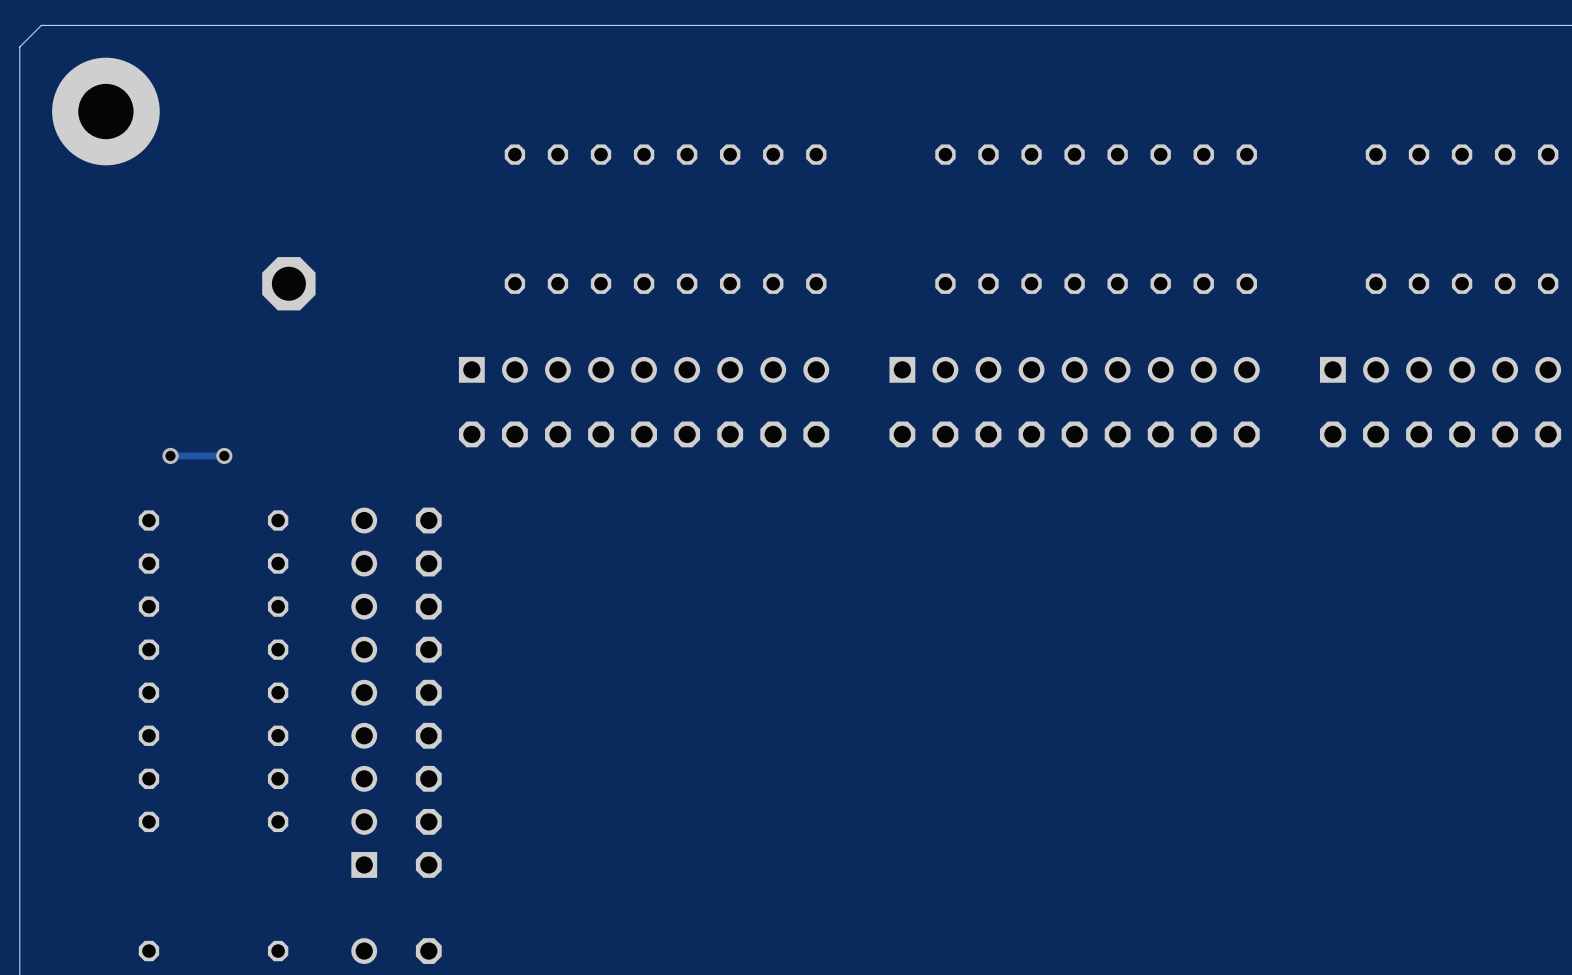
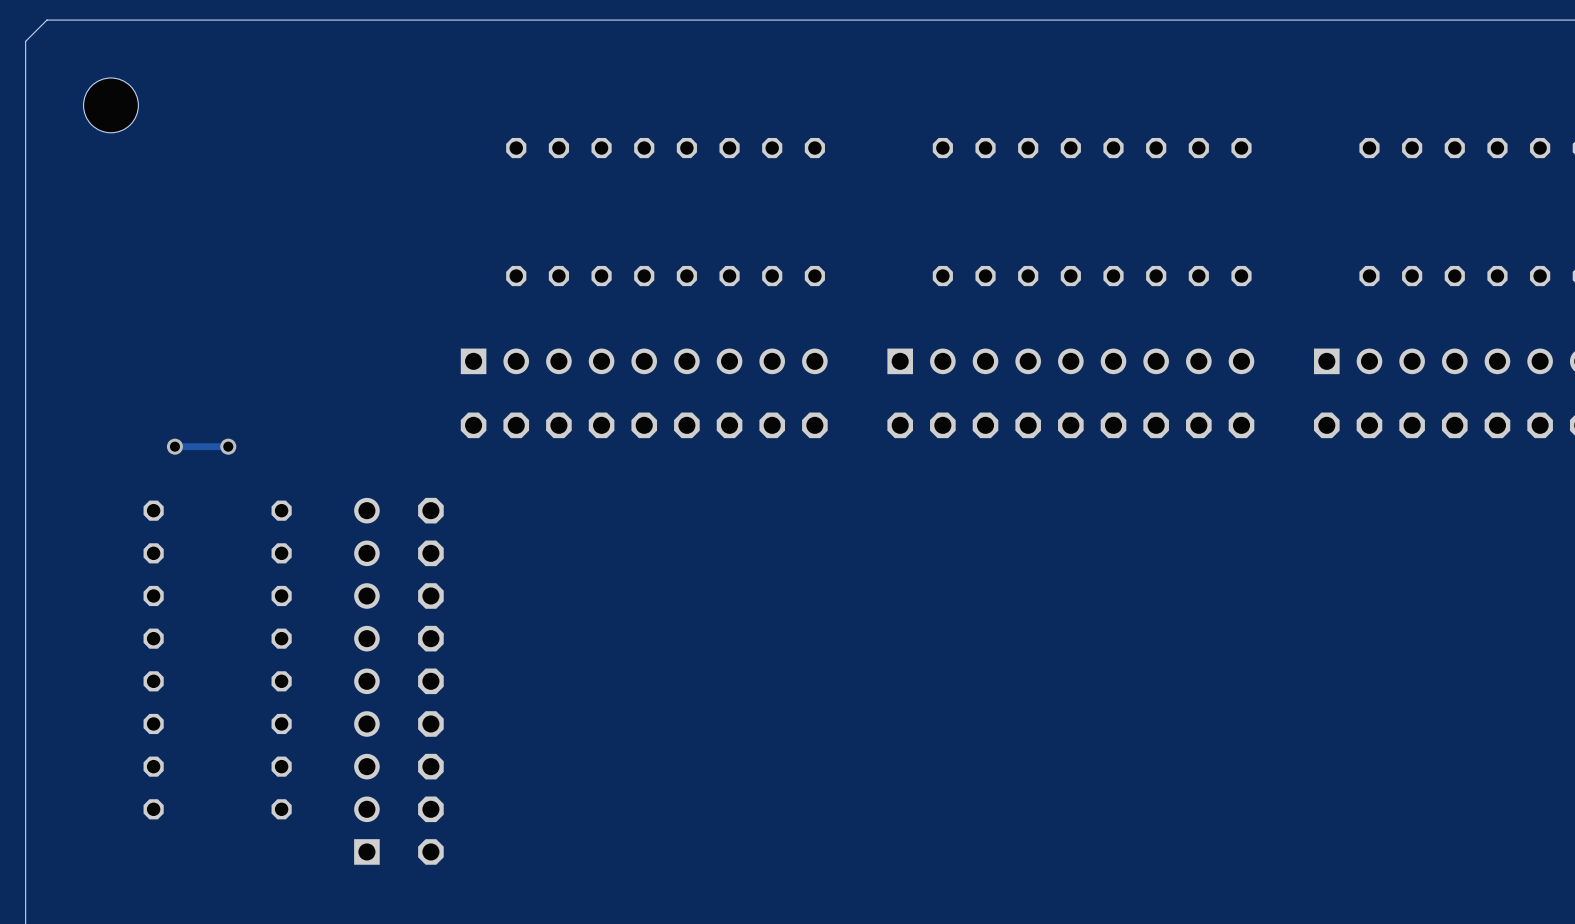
part: (105, 111) -> none
hole: none -> (110, 105)
part: (288, 283) -> none

